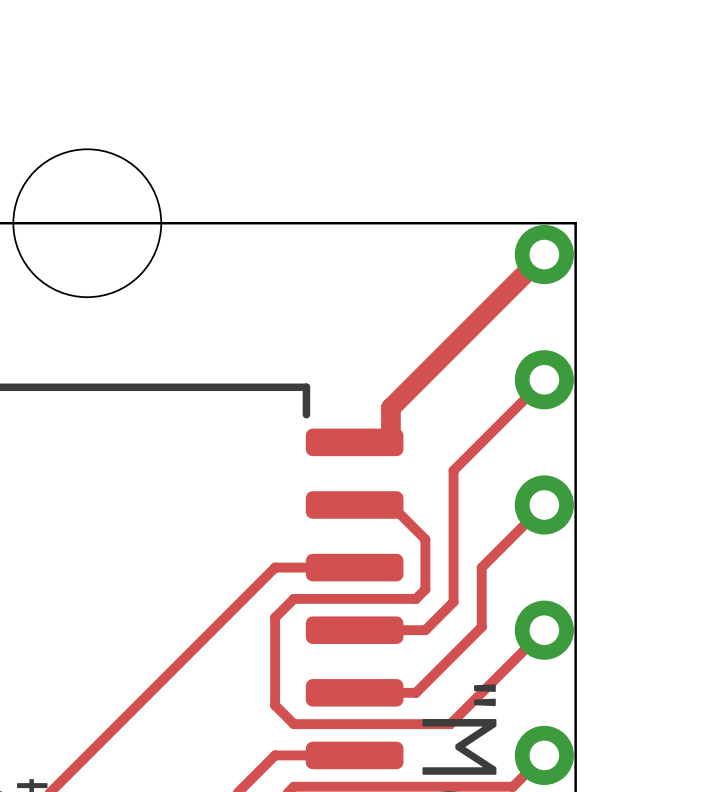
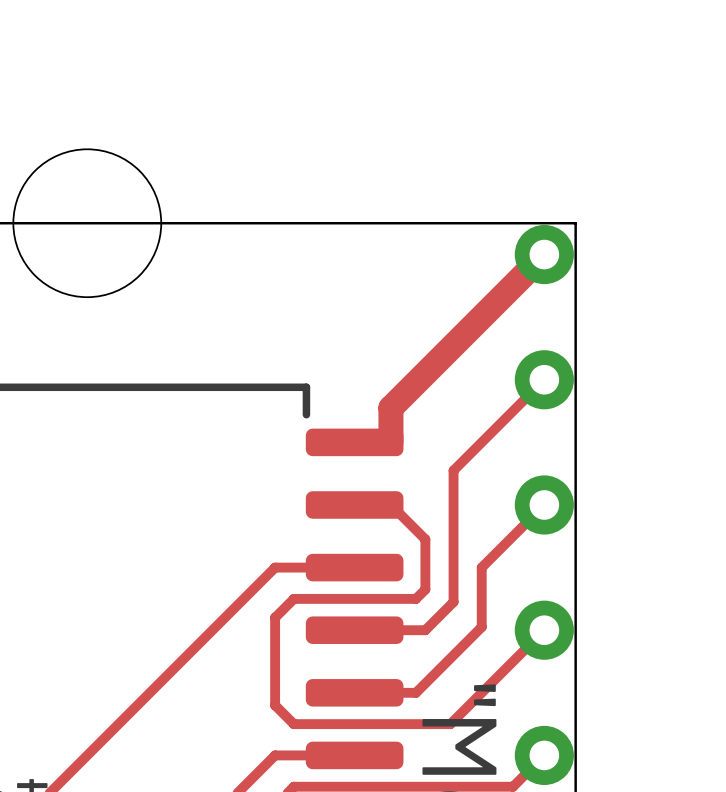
track width: thin (544, 254) (390, 407) (390, 442) -> thick (544, 254) (390, 407) (390, 442)

